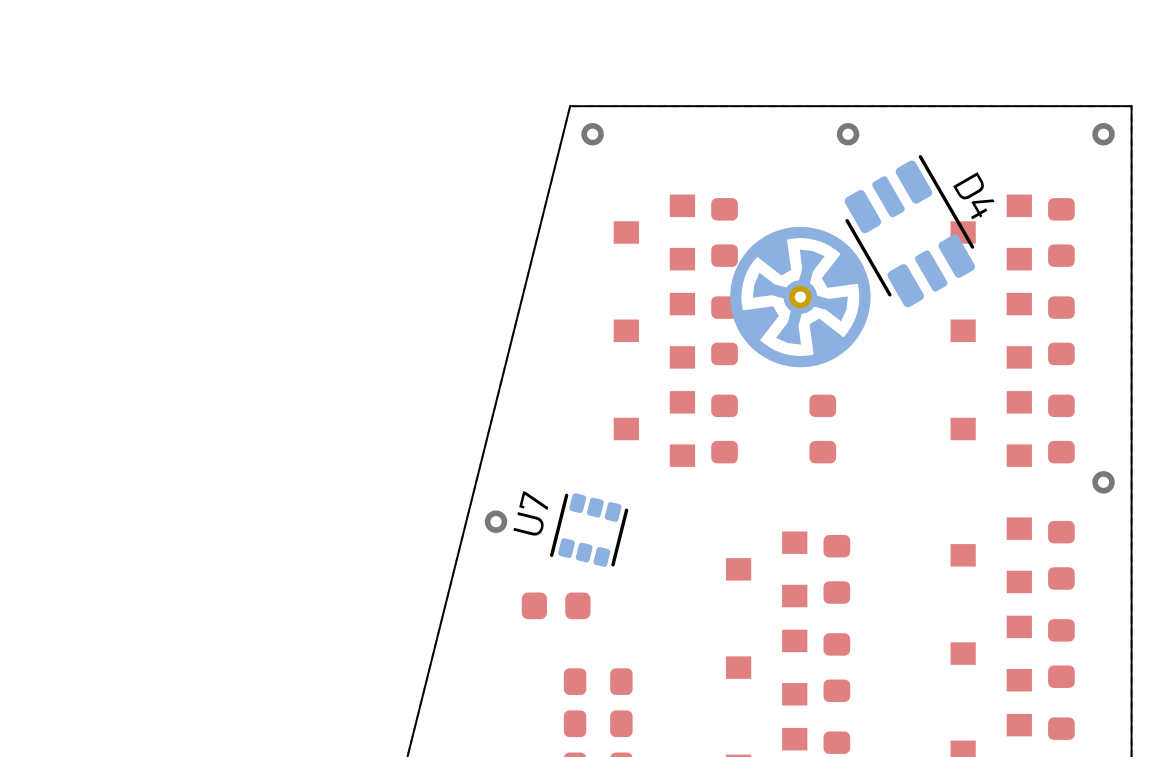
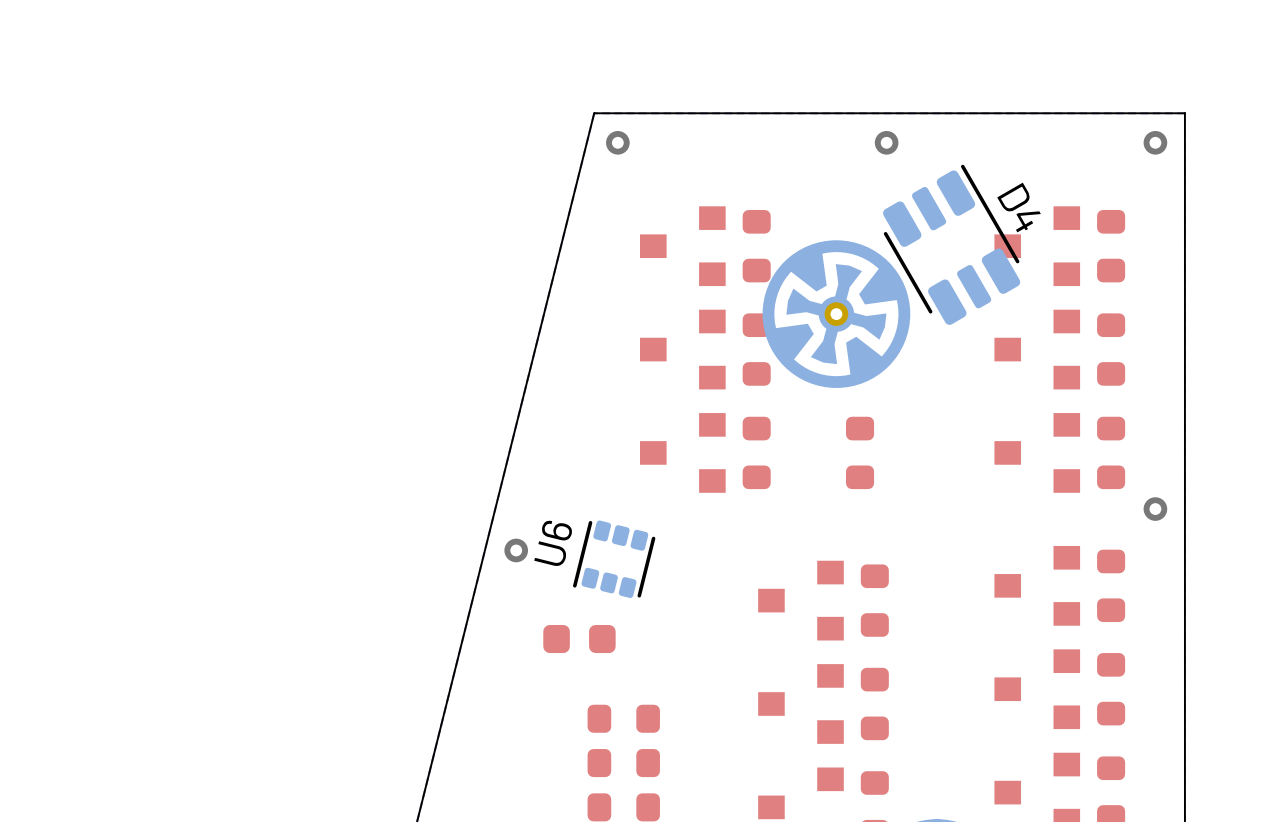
U7 name: U7 (530, 513) -> U6 (553, 543)

